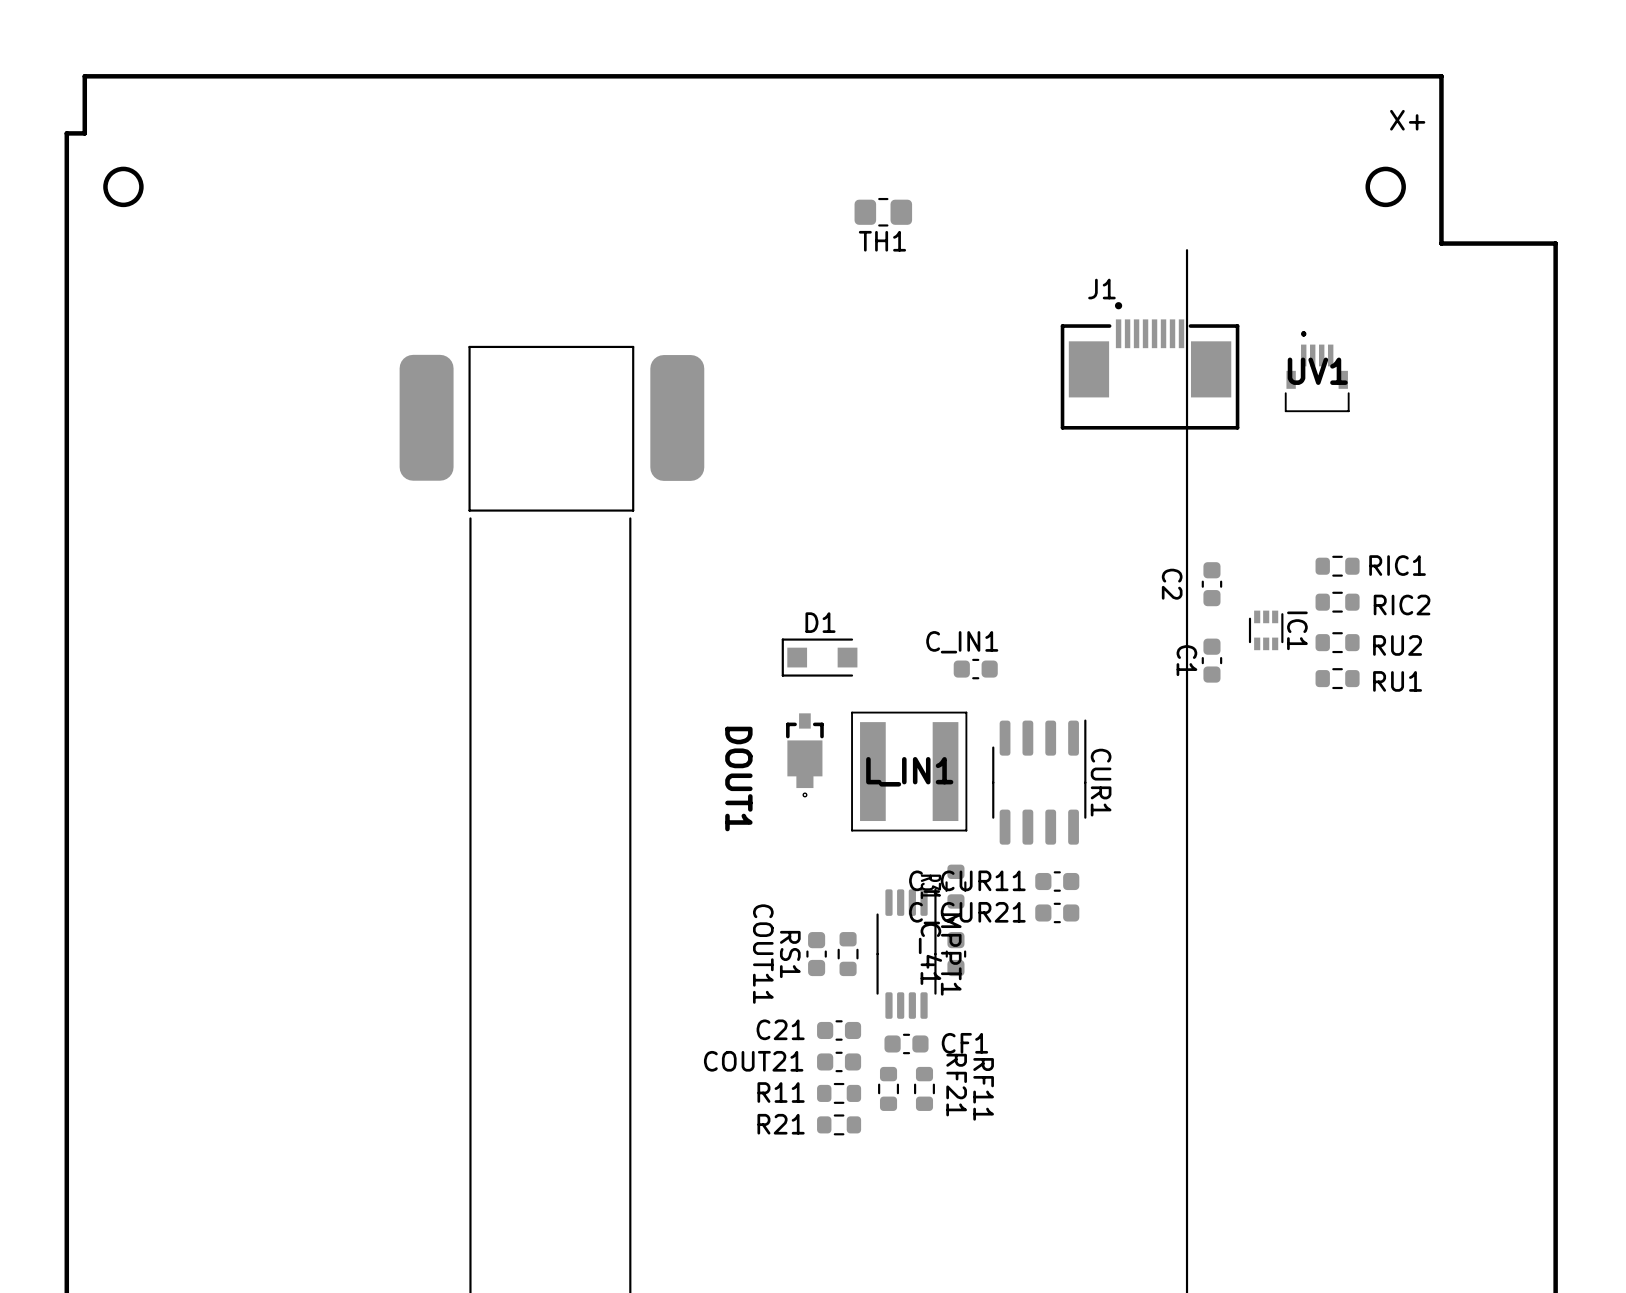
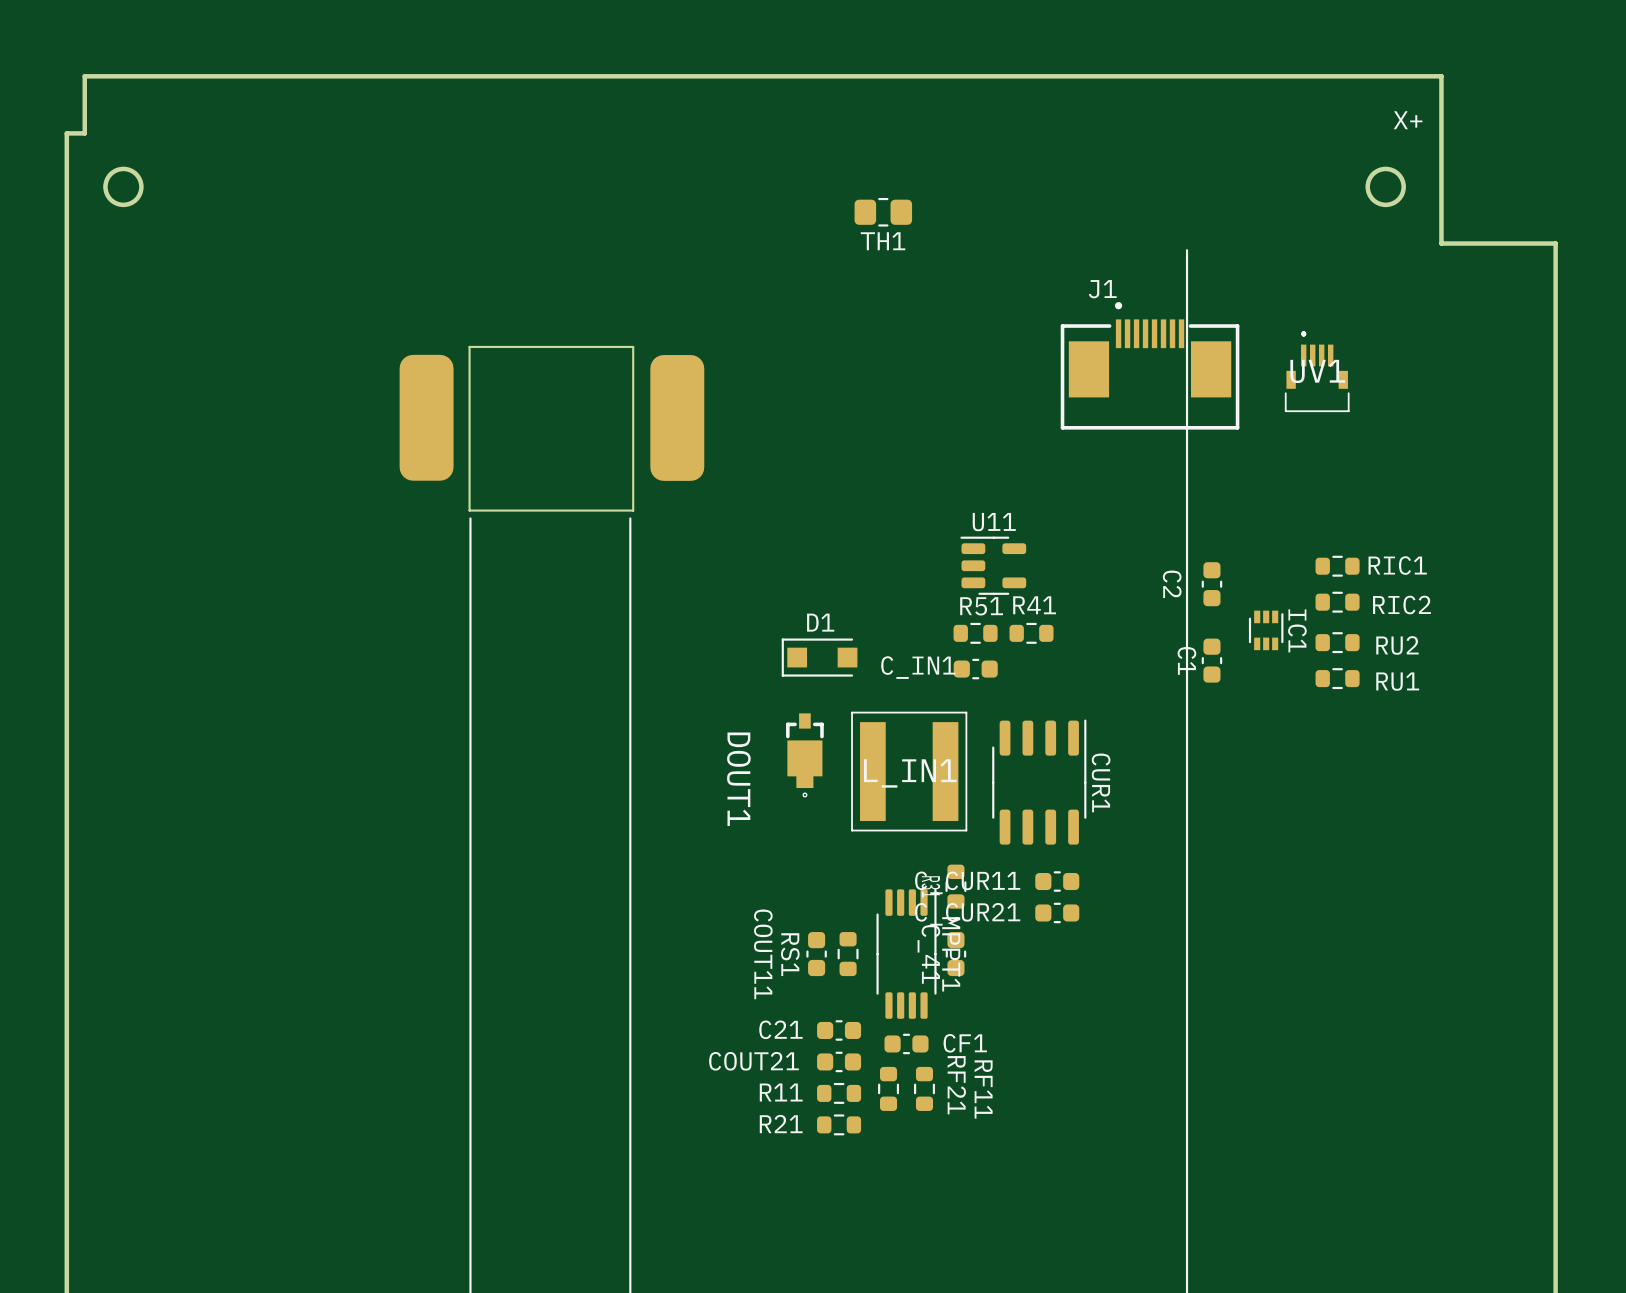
U11: none -> (993, 565)
R51: none -> (975, 633)
R41: none -> (1031, 633)
C_IN1 name position: C_IN1 (962, 642) -> C_IN1 (918, 667)

